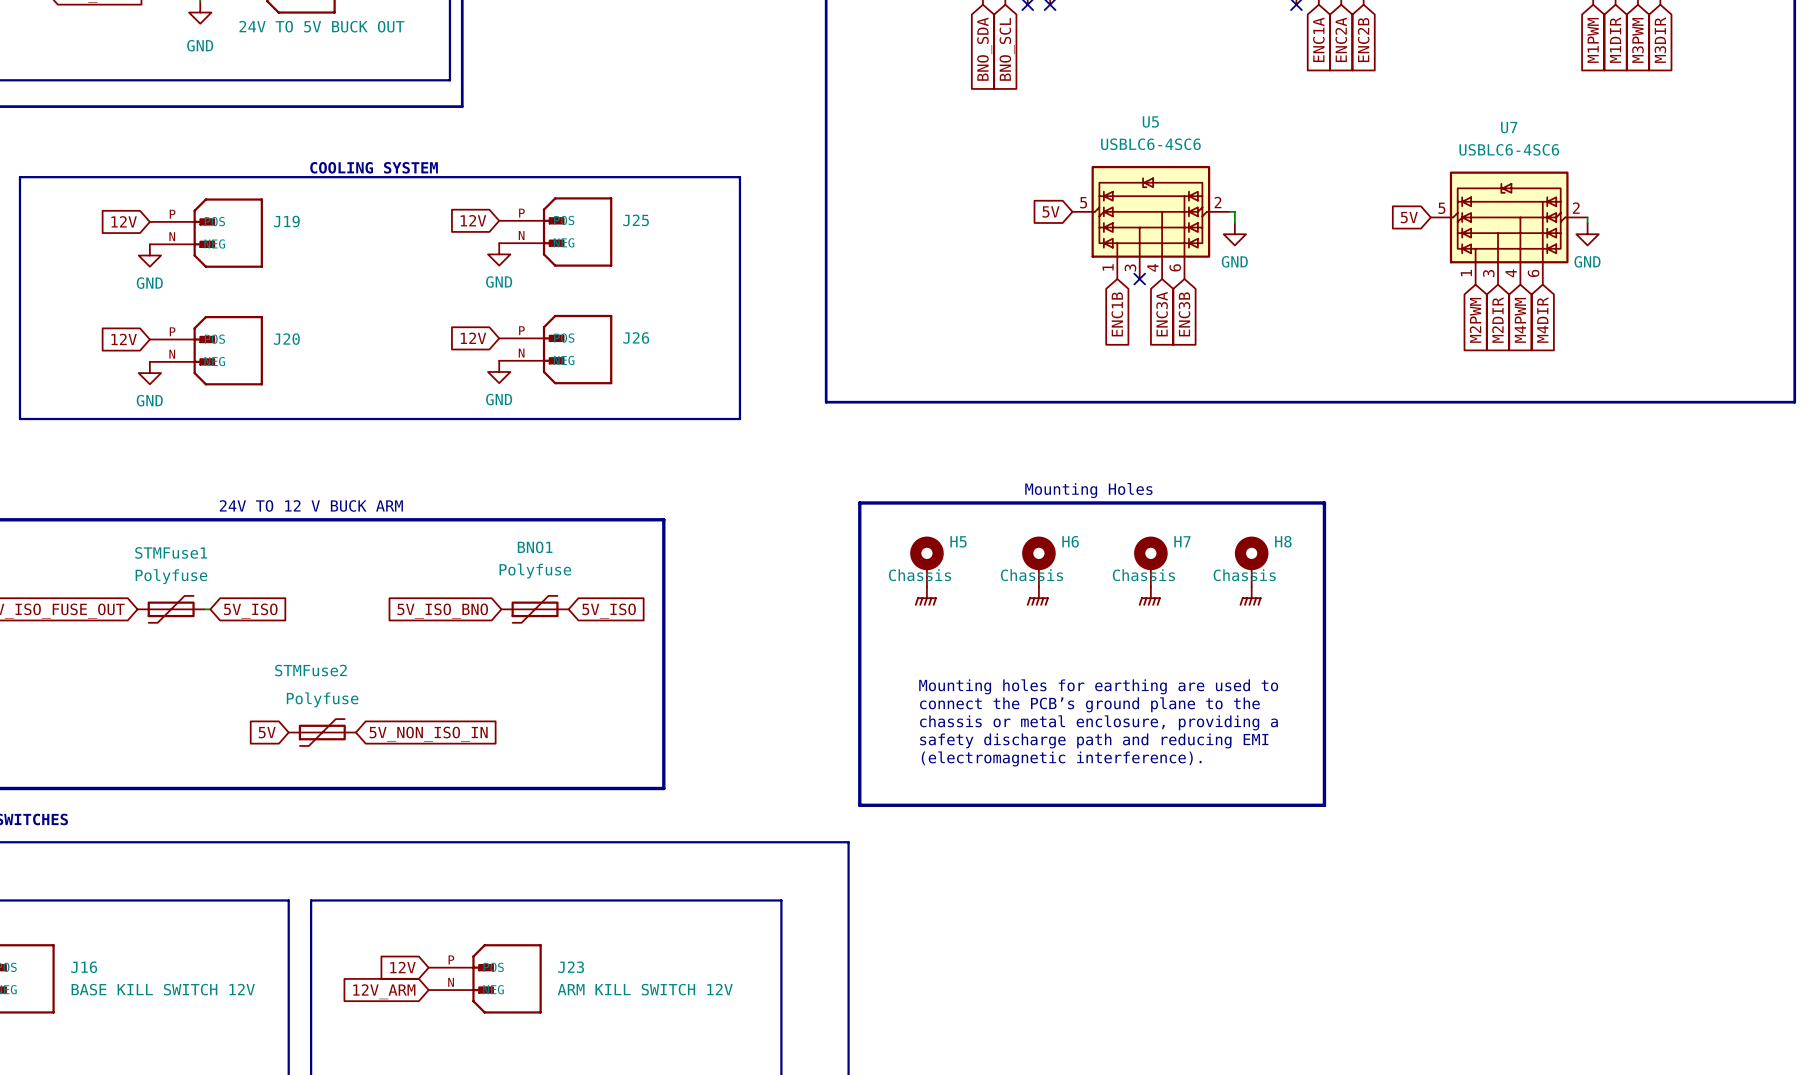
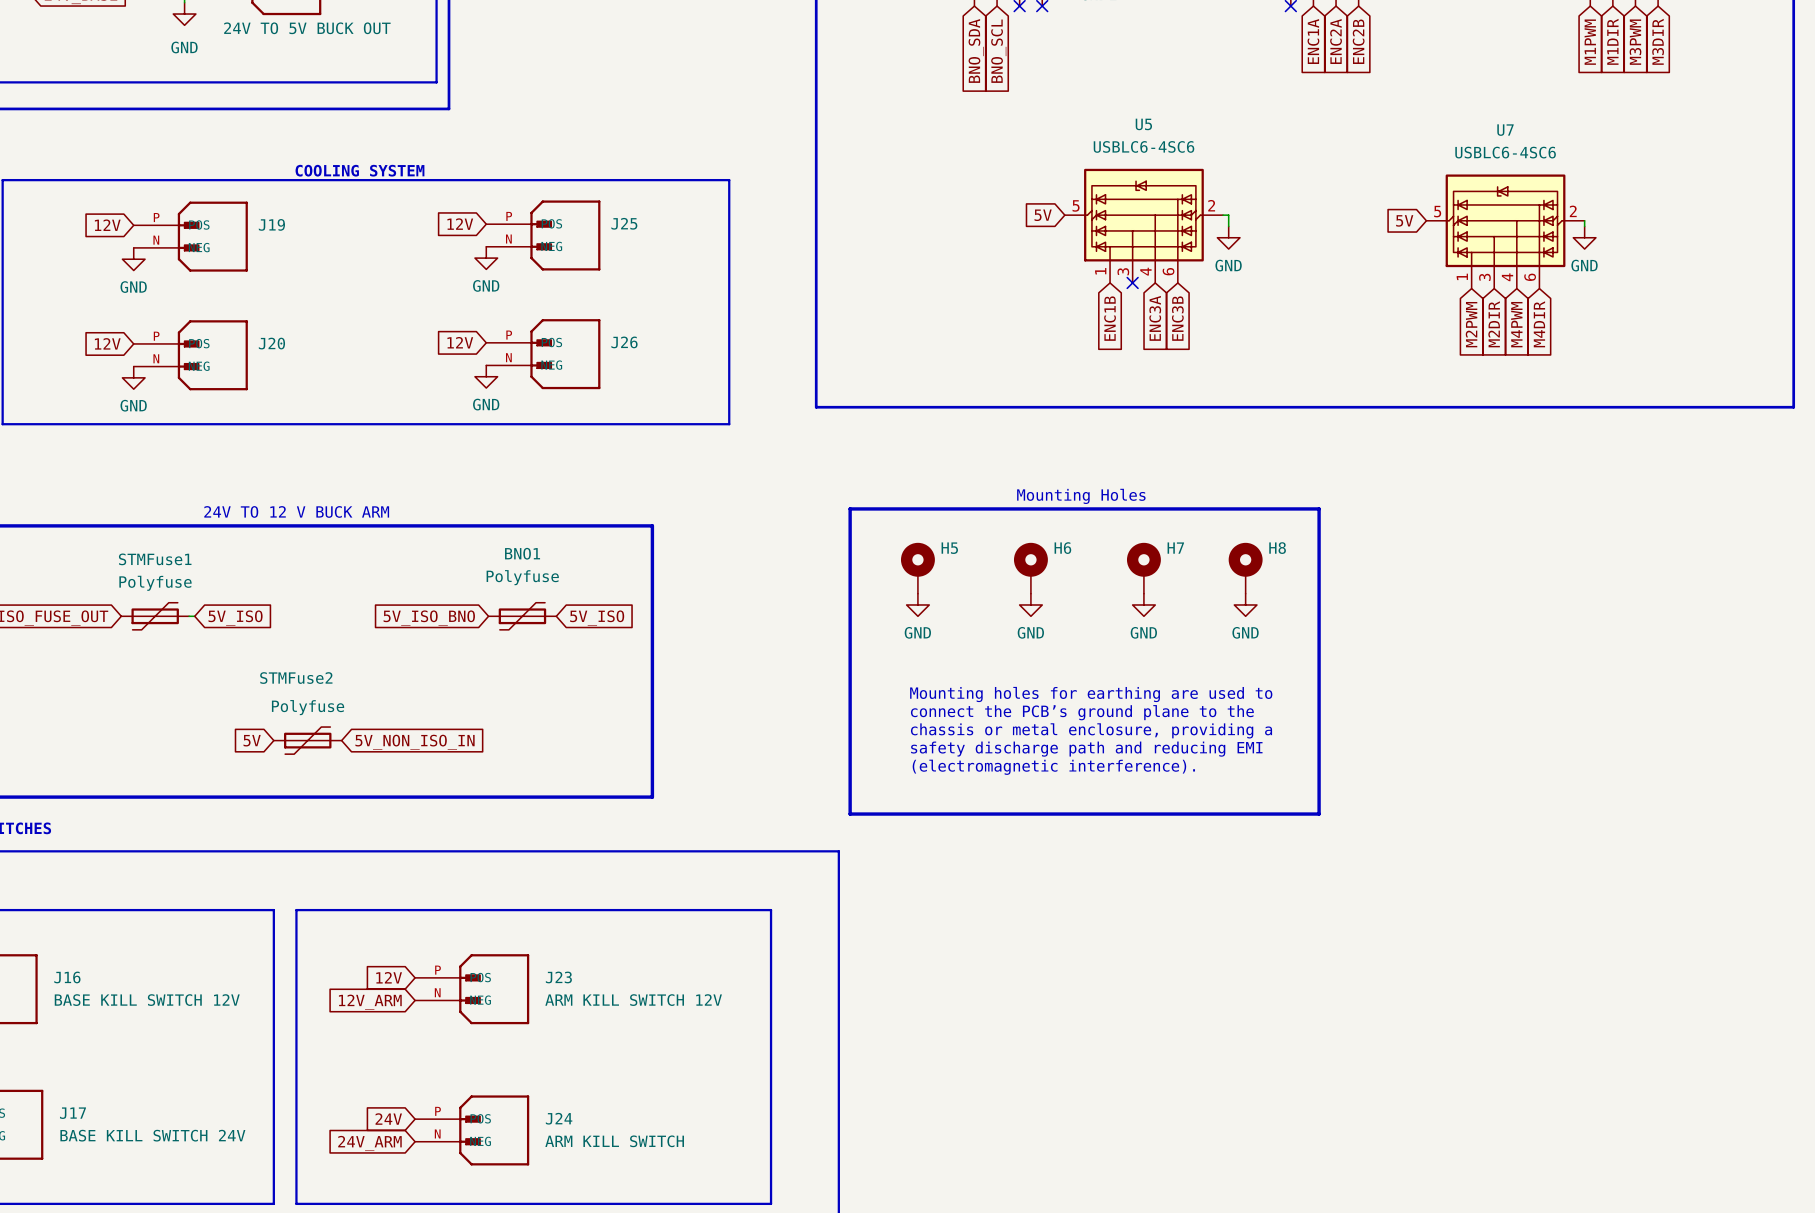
power symbol: Chassis (925, 596) -> GND (917, 604)
power symbol: Chassis (1037, 596) -> GND (1030, 604)
power symbol: Chassis (1149, 596) -> GND (1143, 604)
power symbol: Chassis (1250, 596) -> GND (1245, 604)

